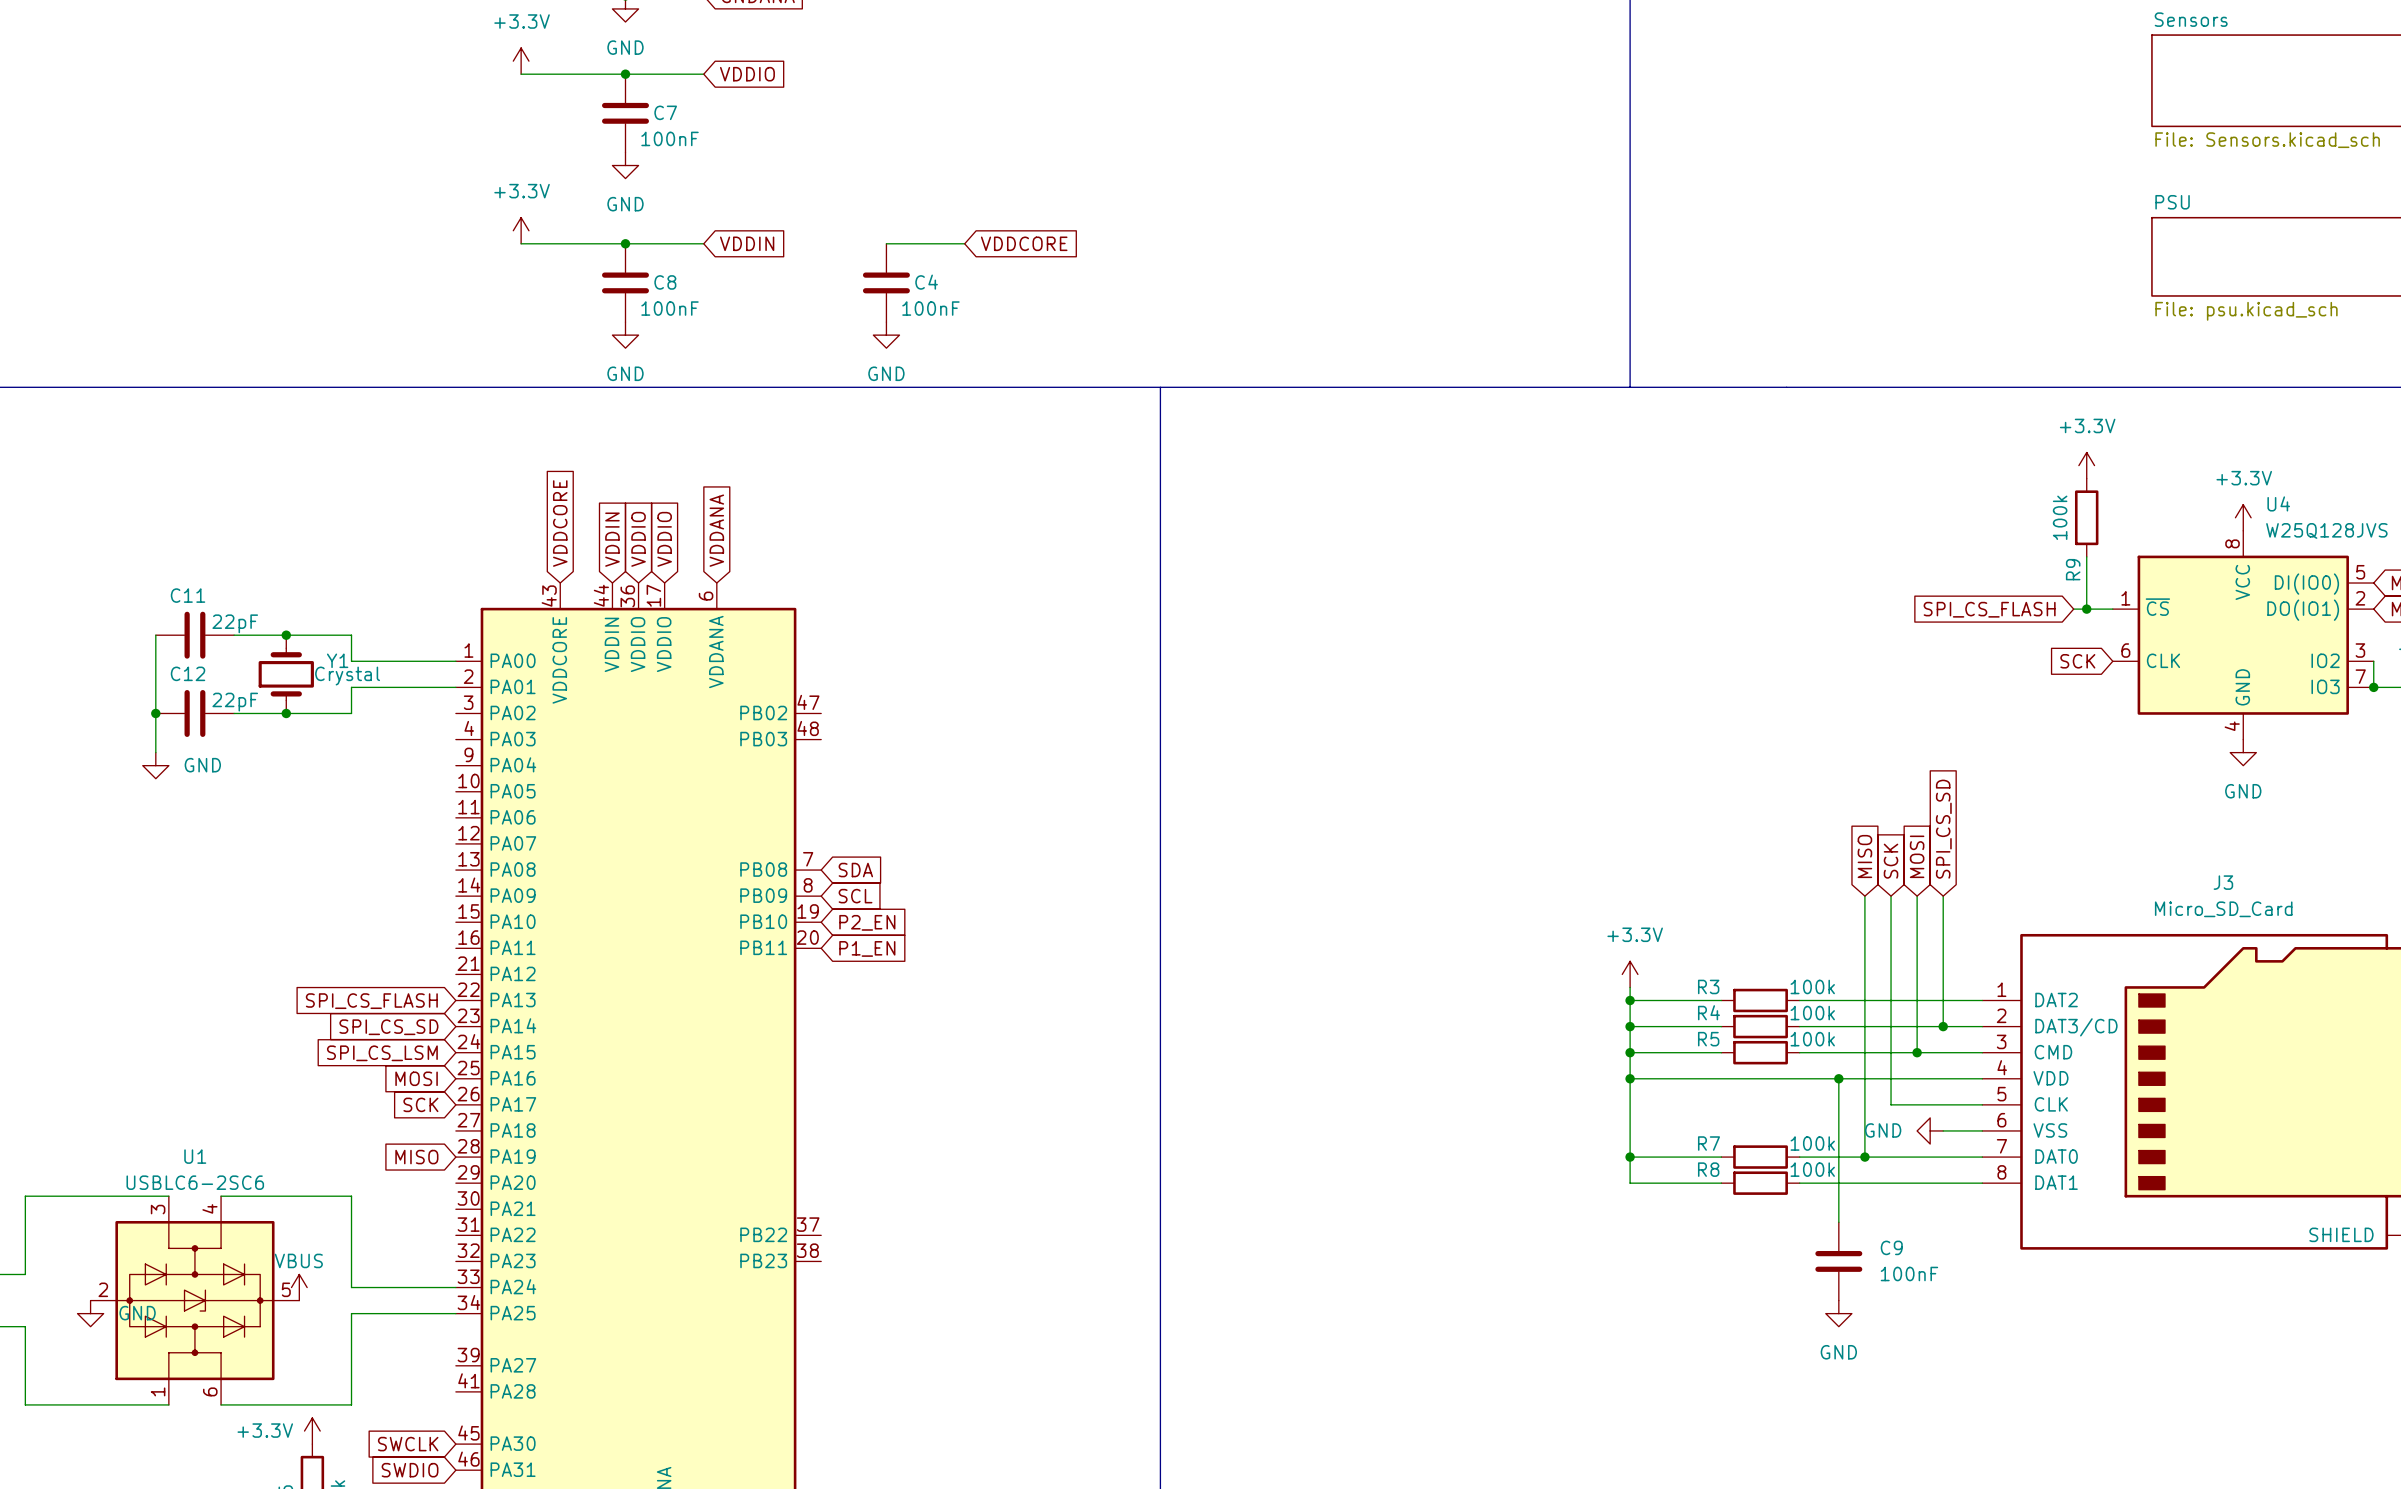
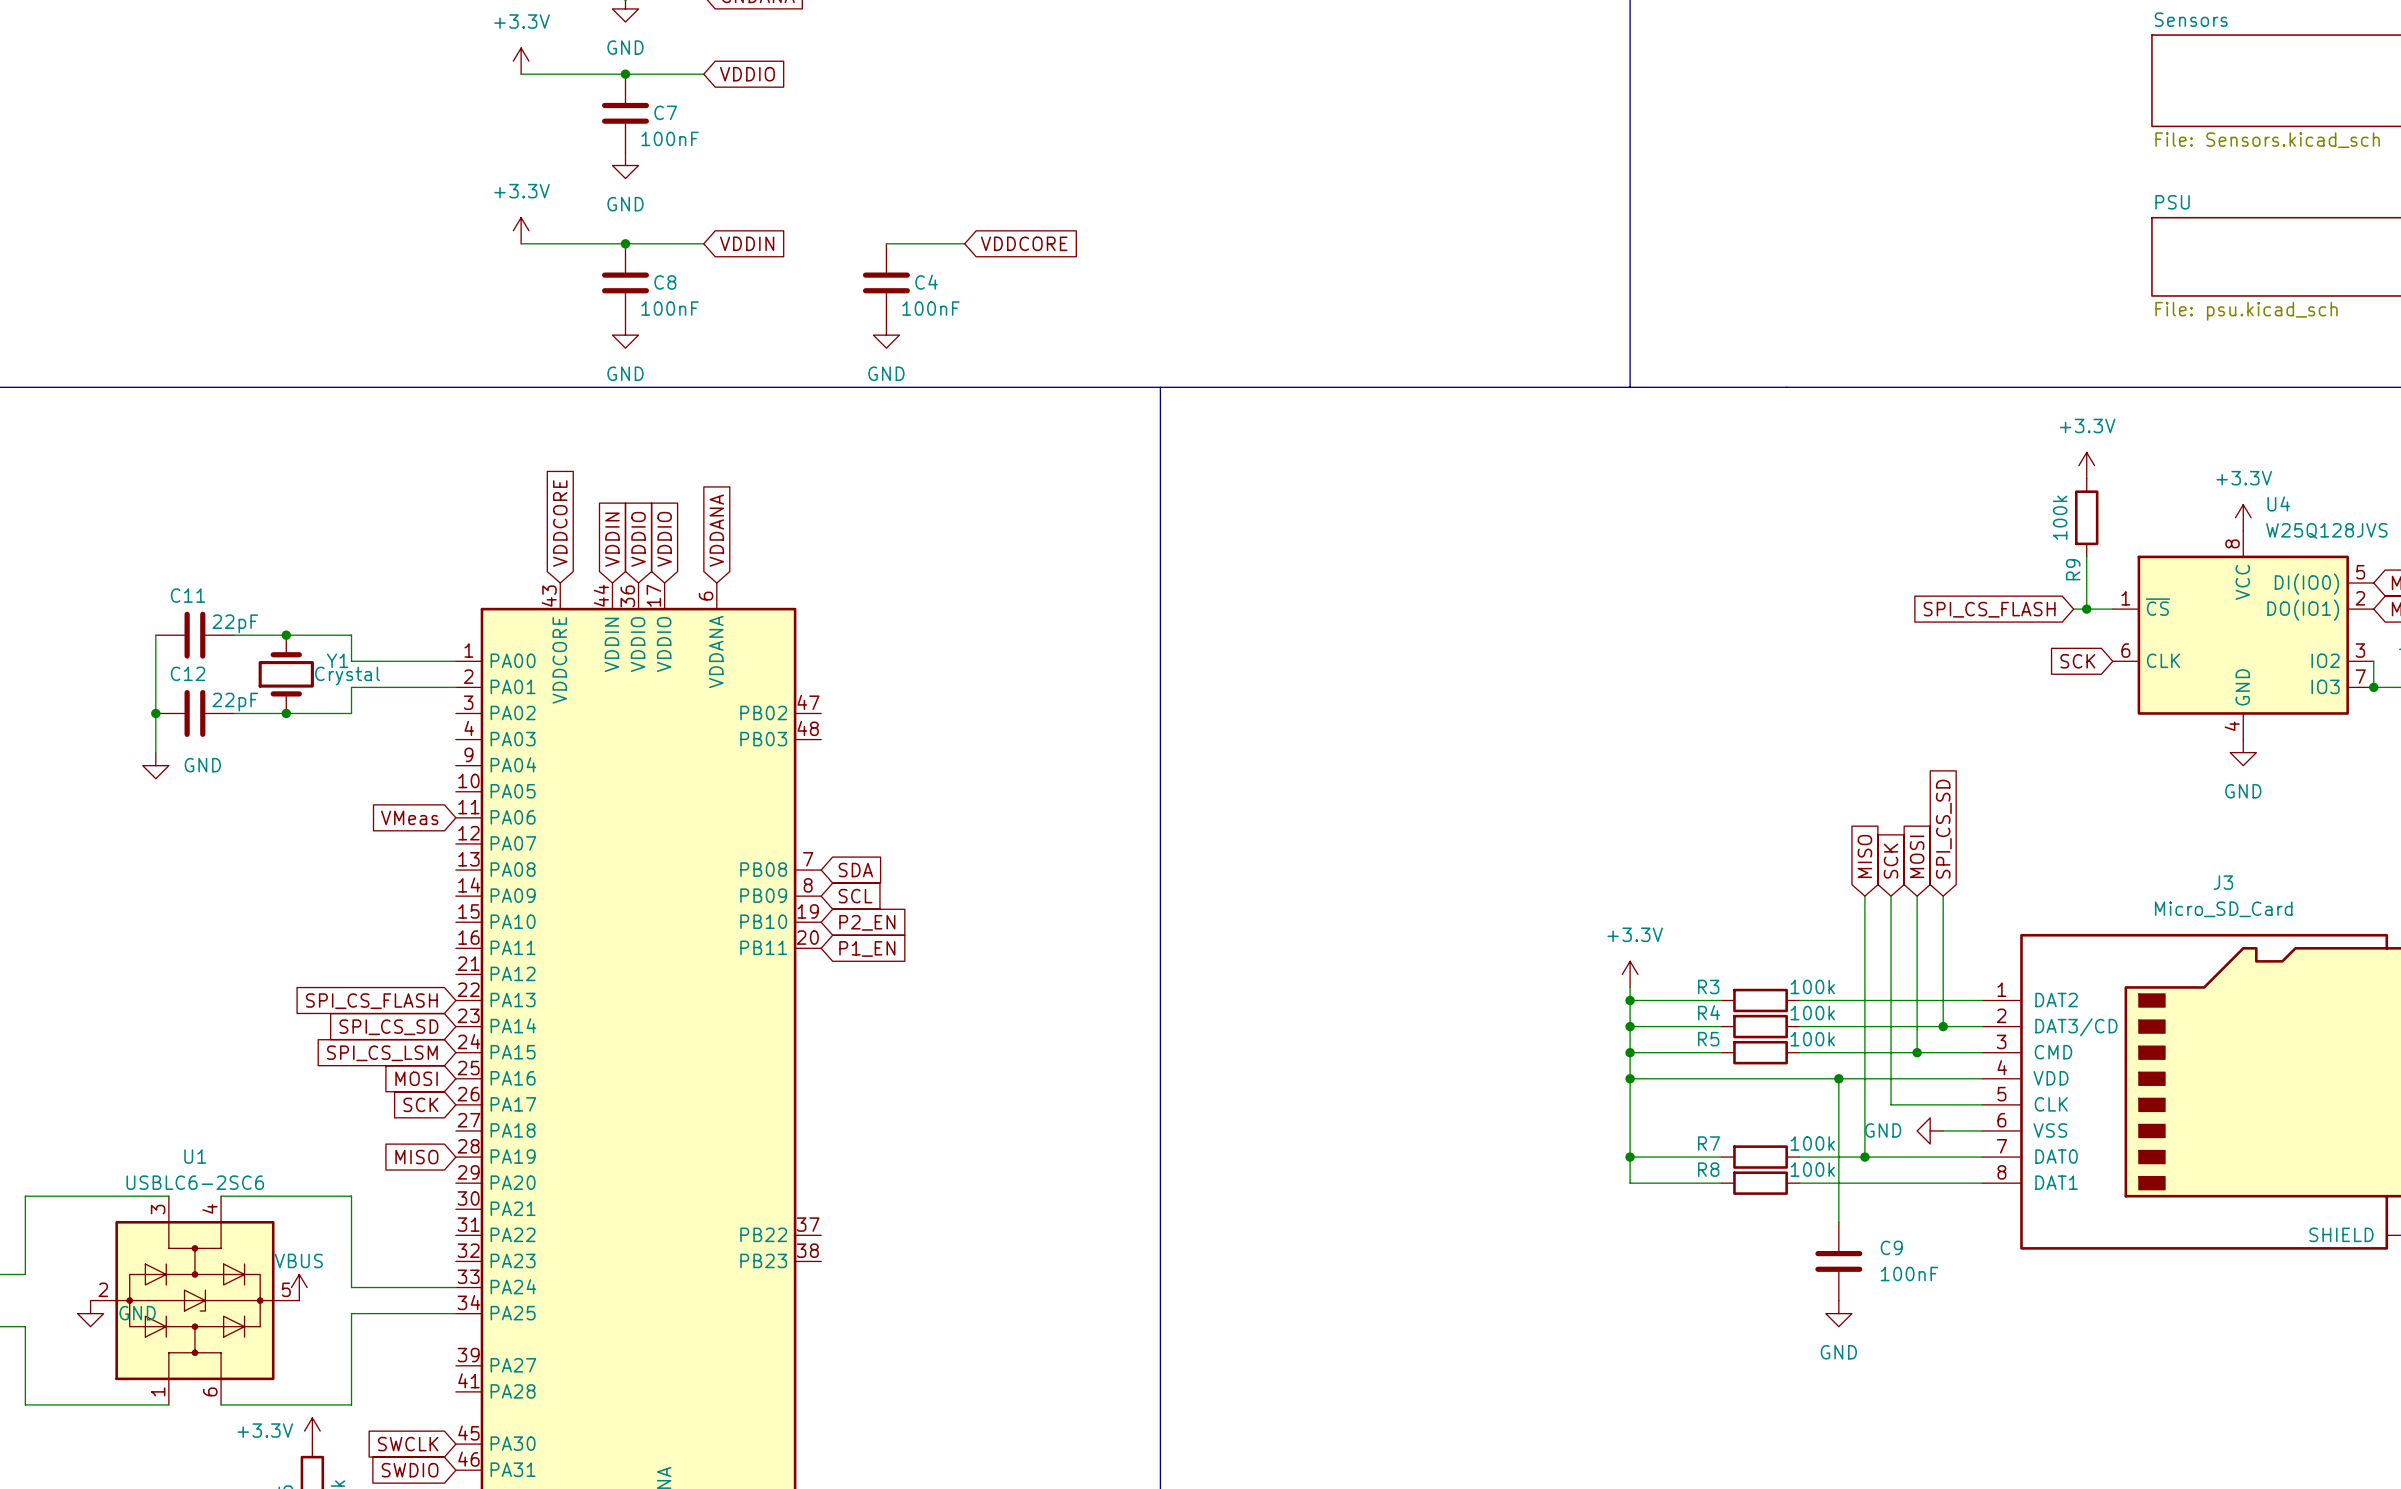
global label: none -> VMeas (409, 817)

